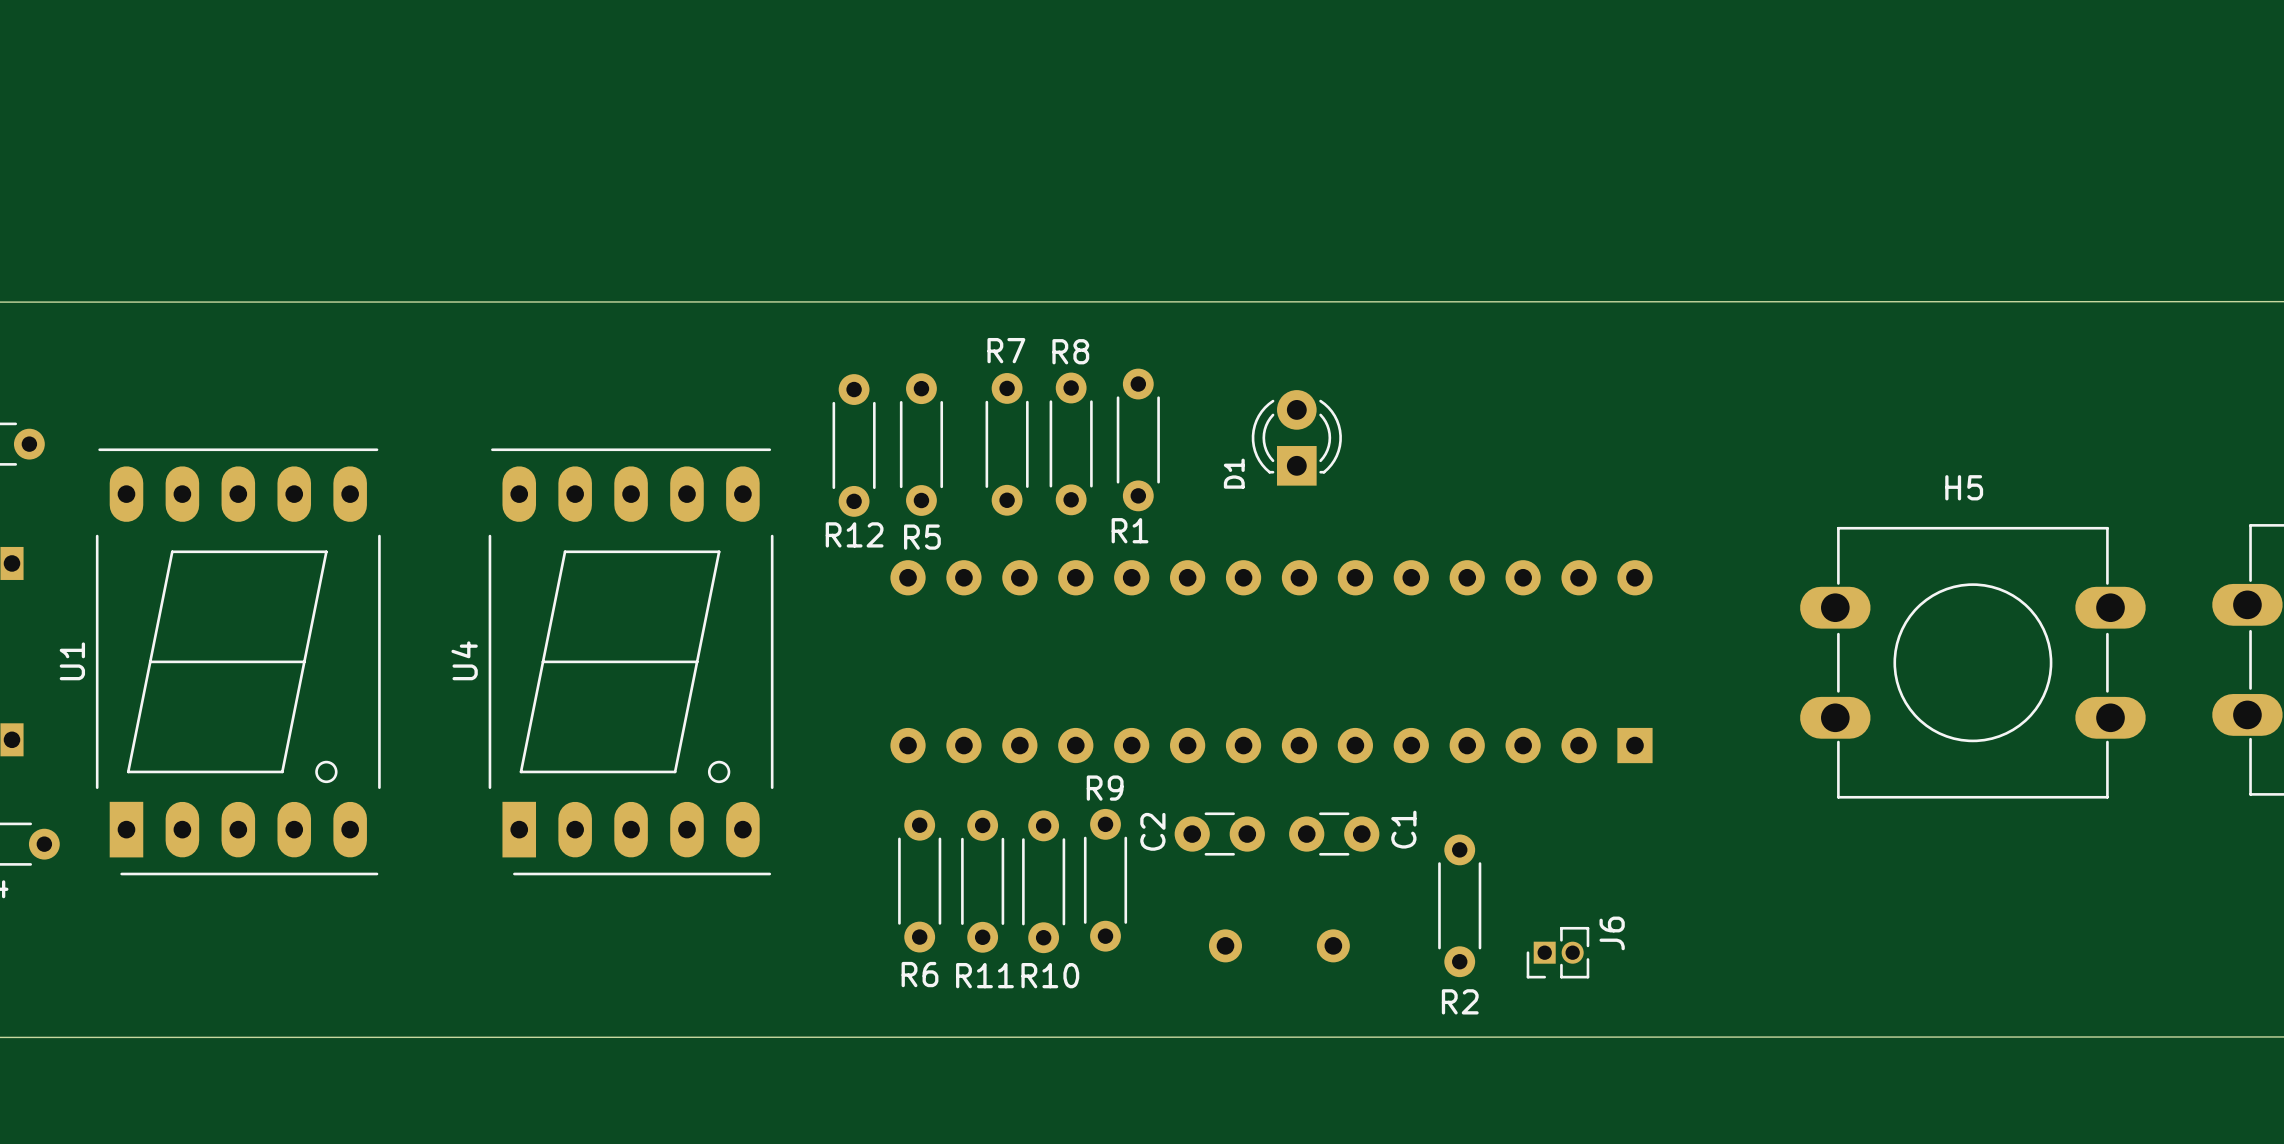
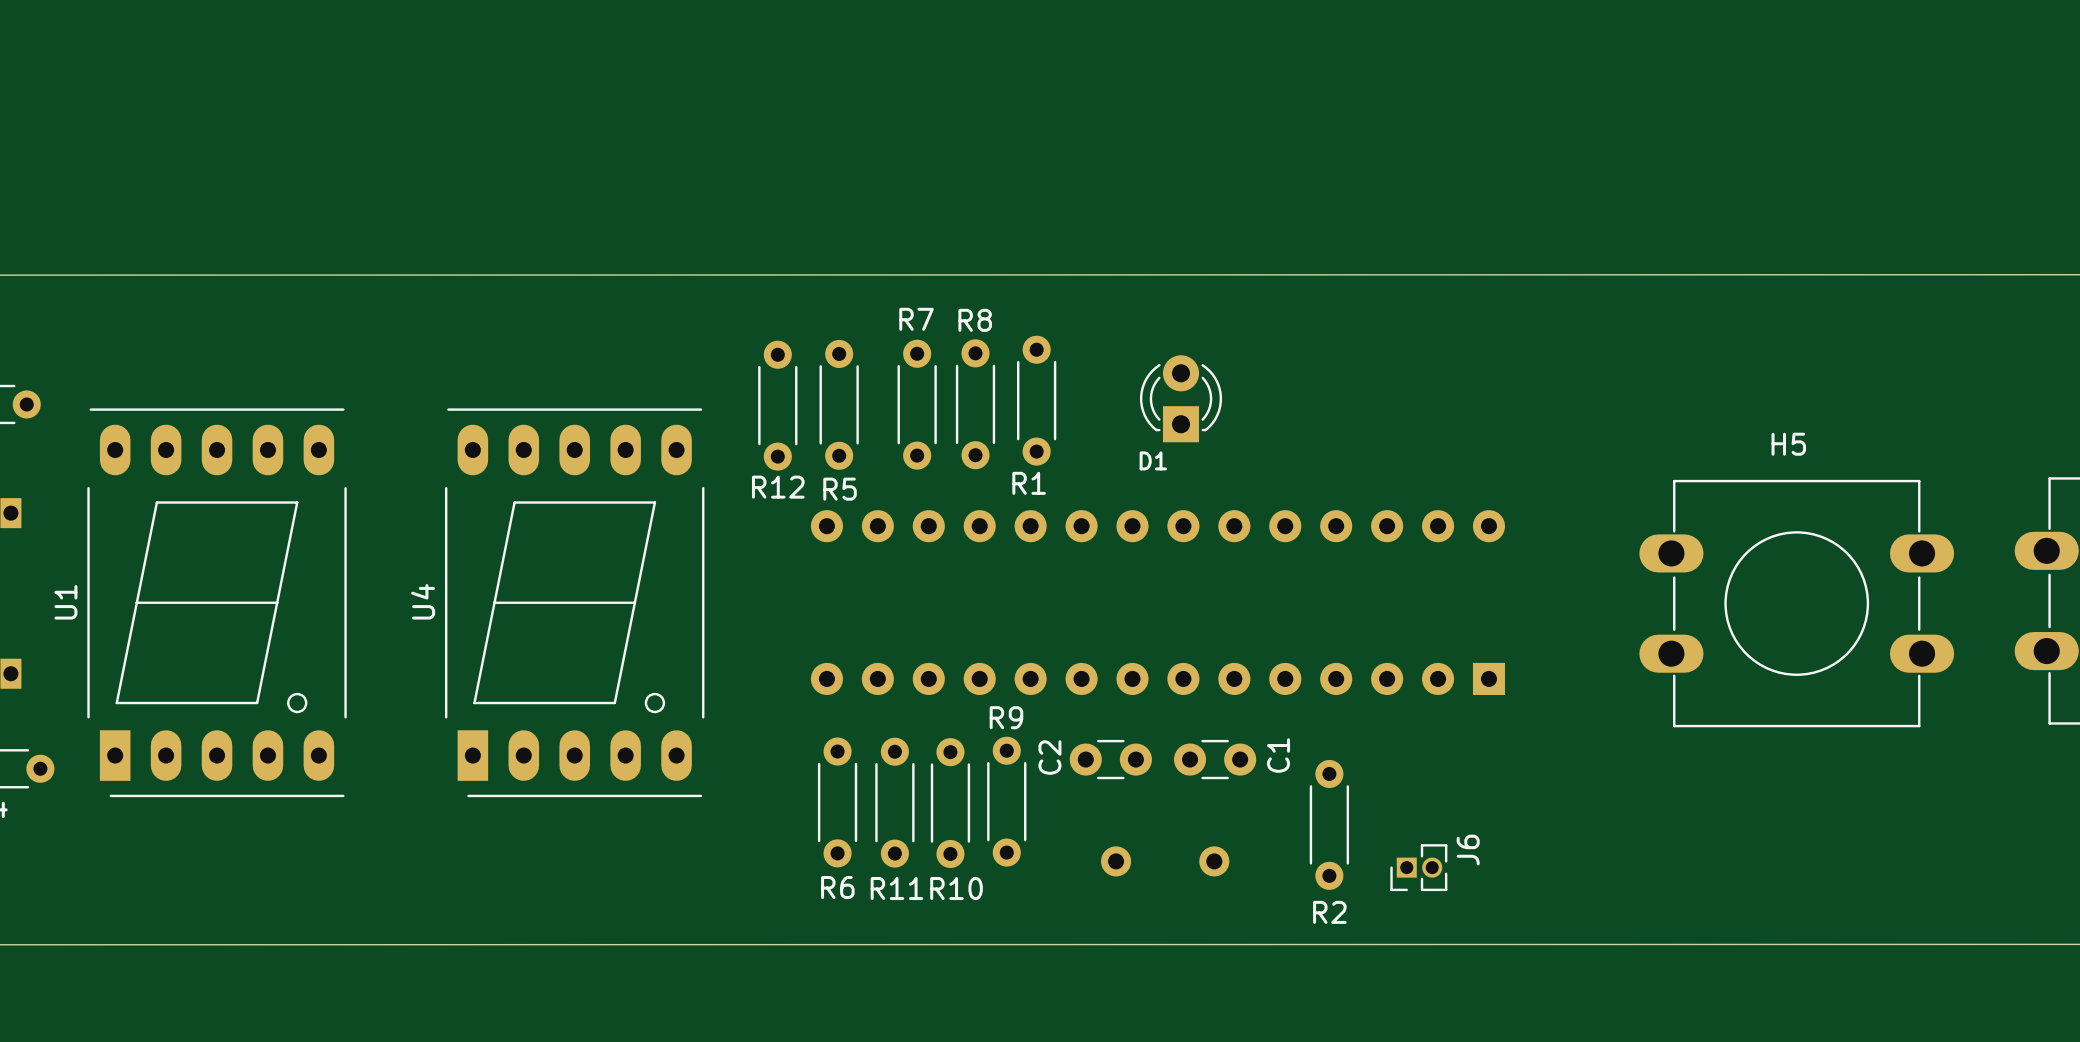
D1 name rotation: 0° (1234, 473) -> 90° clockwise (1153, 460)
D1 name position: D1 (1234, 473) -> D1 (1153, 460)

